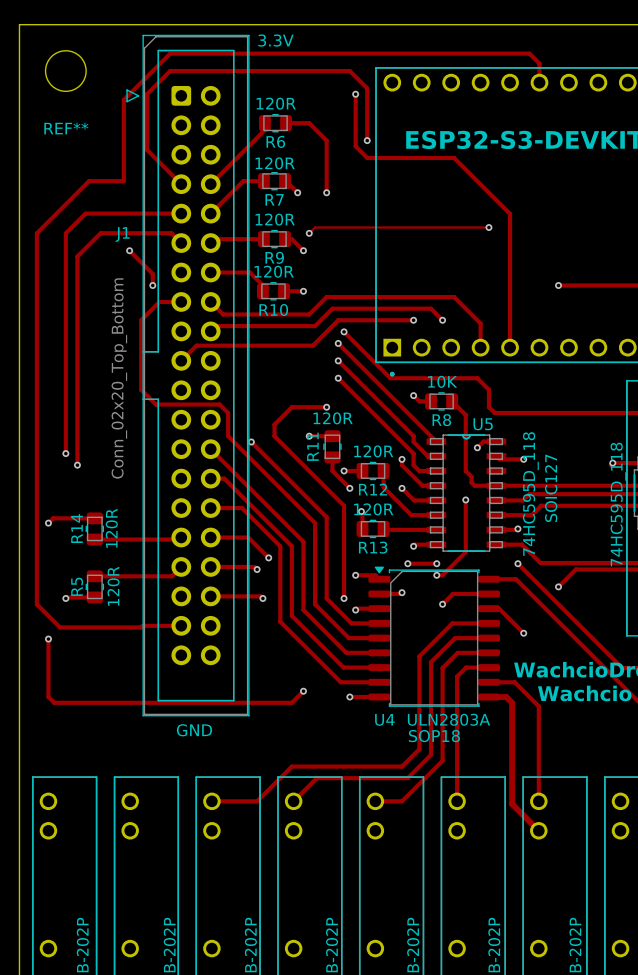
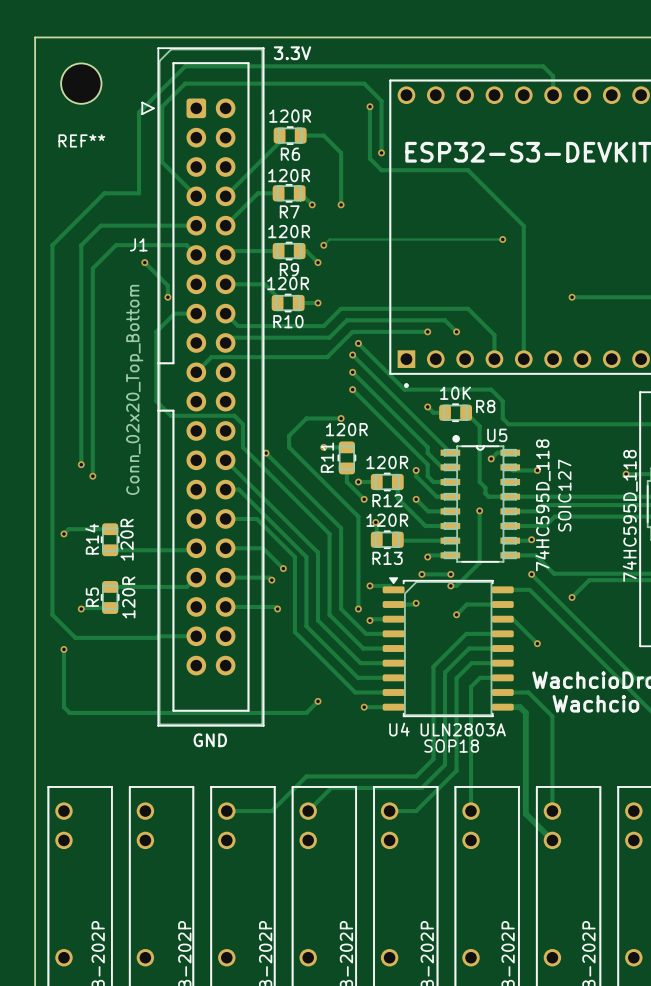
R8 name position: R8 (441, 420) -> R8 (485, 406)
drawing: none -> [452, 434, 460, 443]

